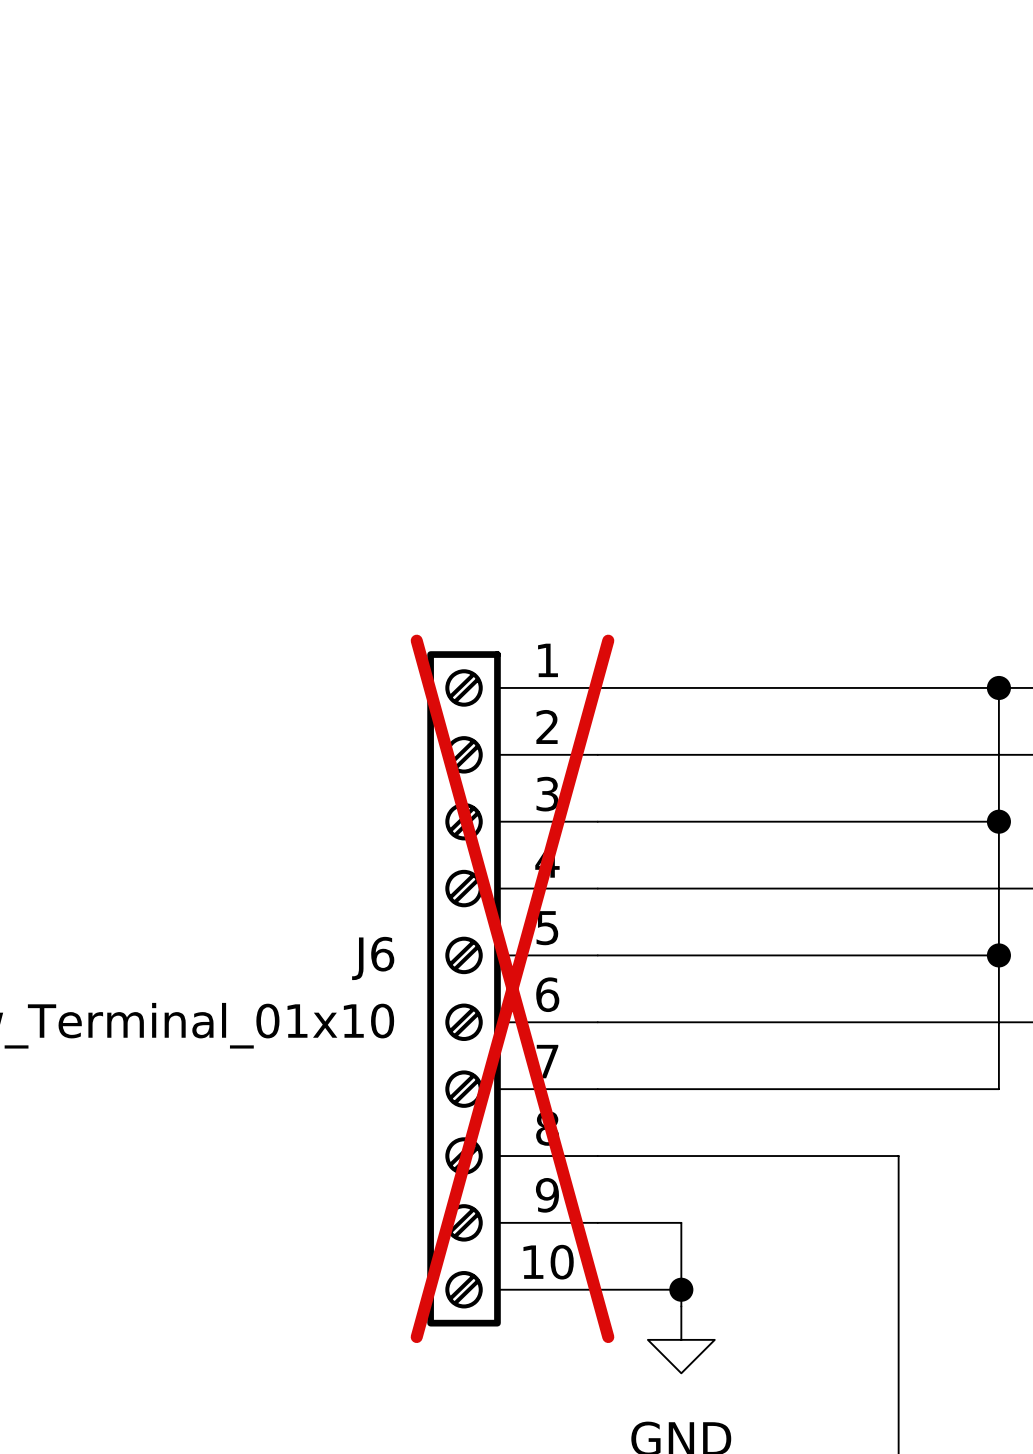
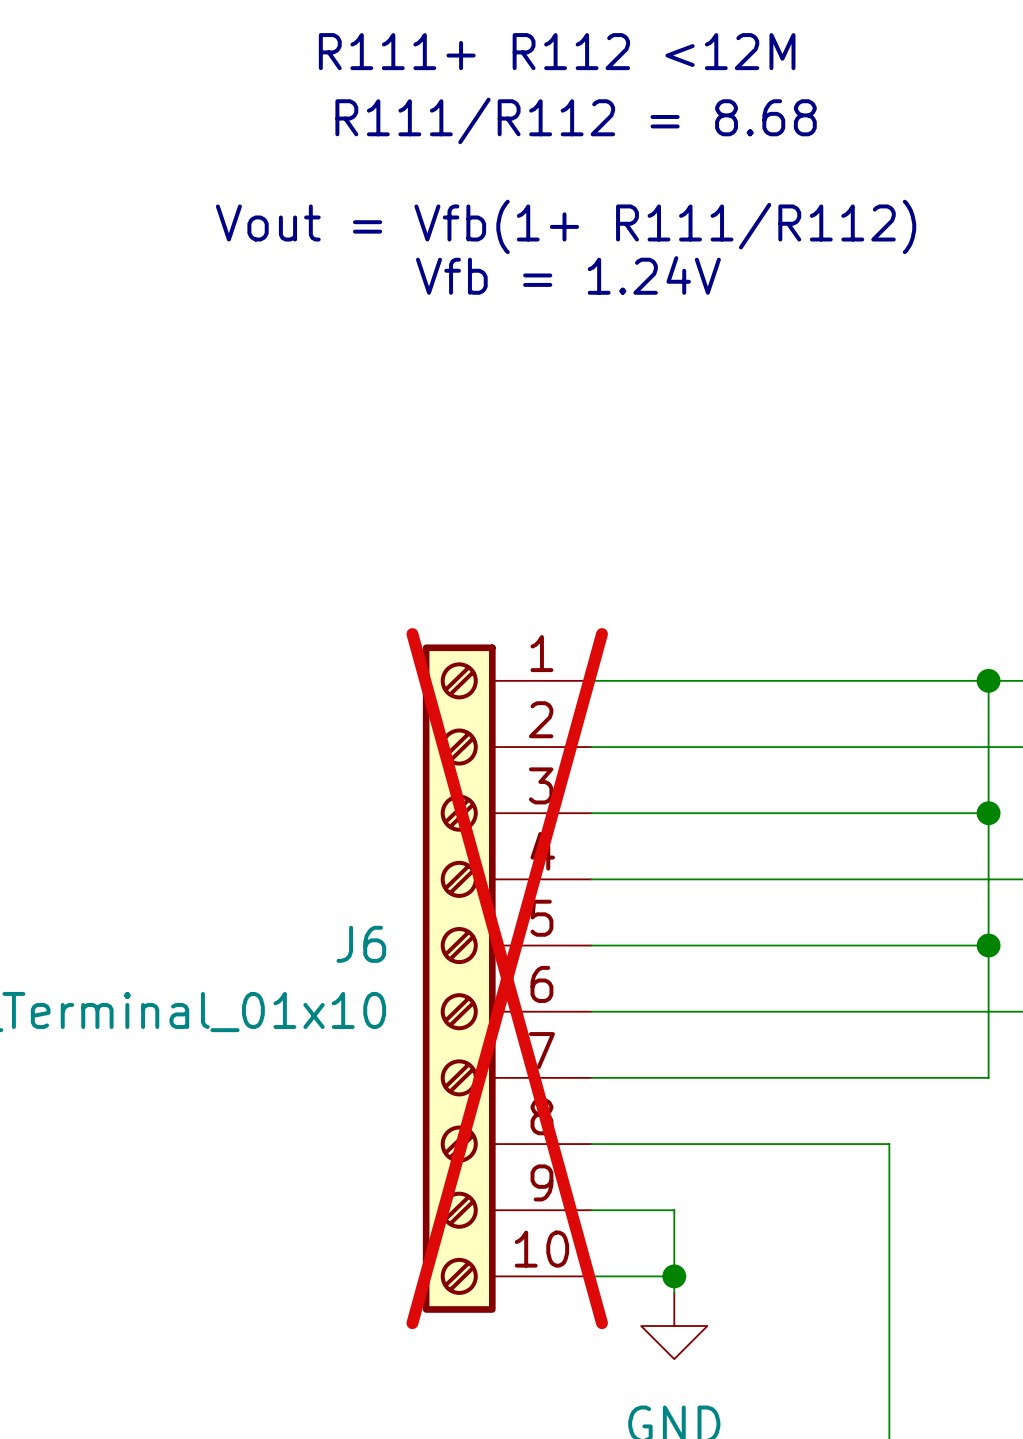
text: none -> R111+ R112 <12M (557, 51)
text: none -> R111/R112 = 8.68 (576, 120)
text: none -> Vout = Vfb(1+ R111/R112) (566, 226)
text: none -> Vfb = 1.24V (568, 275)

